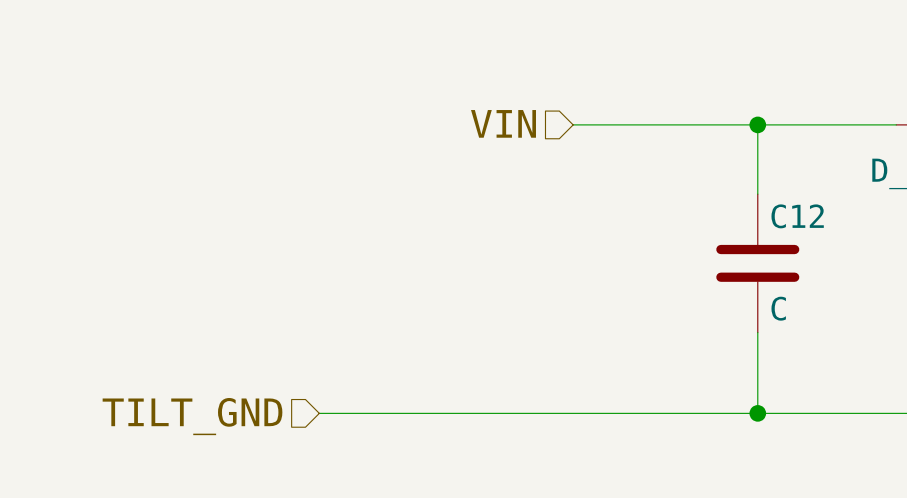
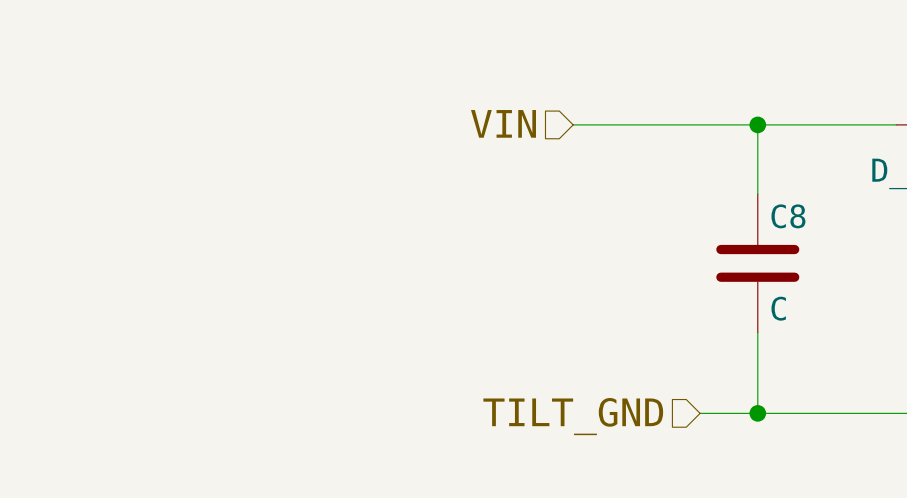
C12 name: C12 (797, 216) -> C8 (788, 216)
wire: (319, 413) (700, 413) -> none
hierarchical label position: TILT_GND (192, 416) -> TILT_GND (573, 416)

